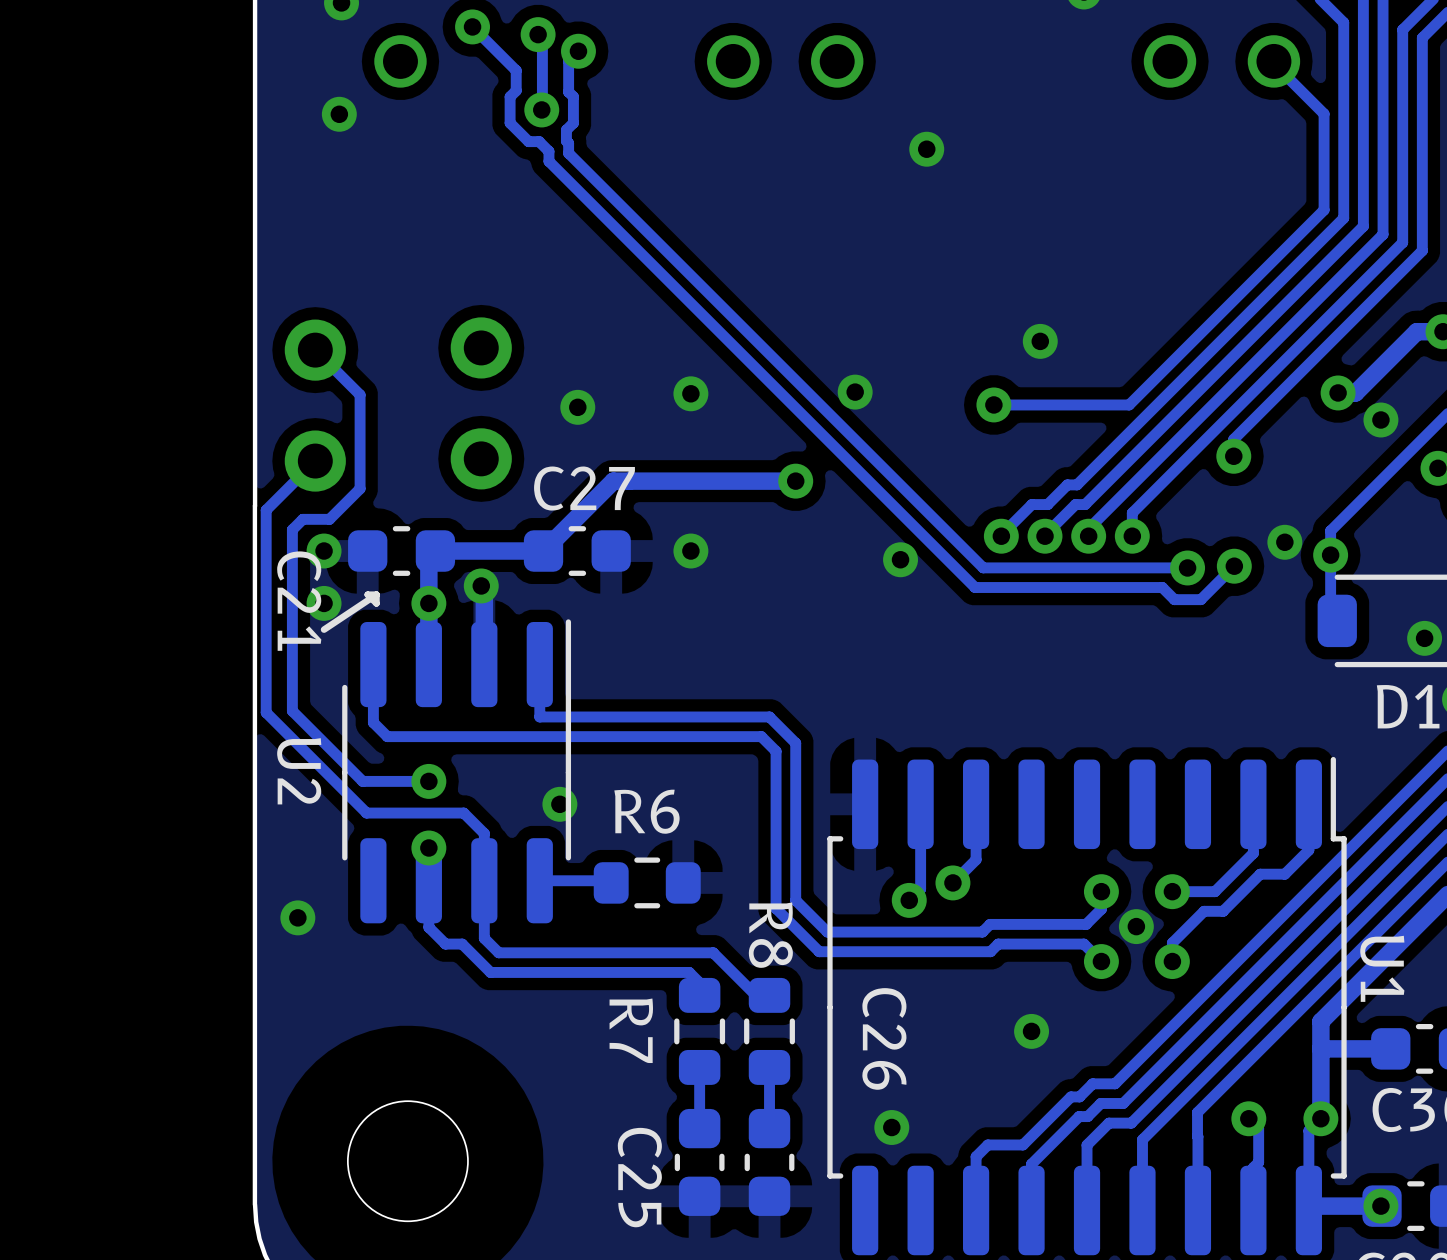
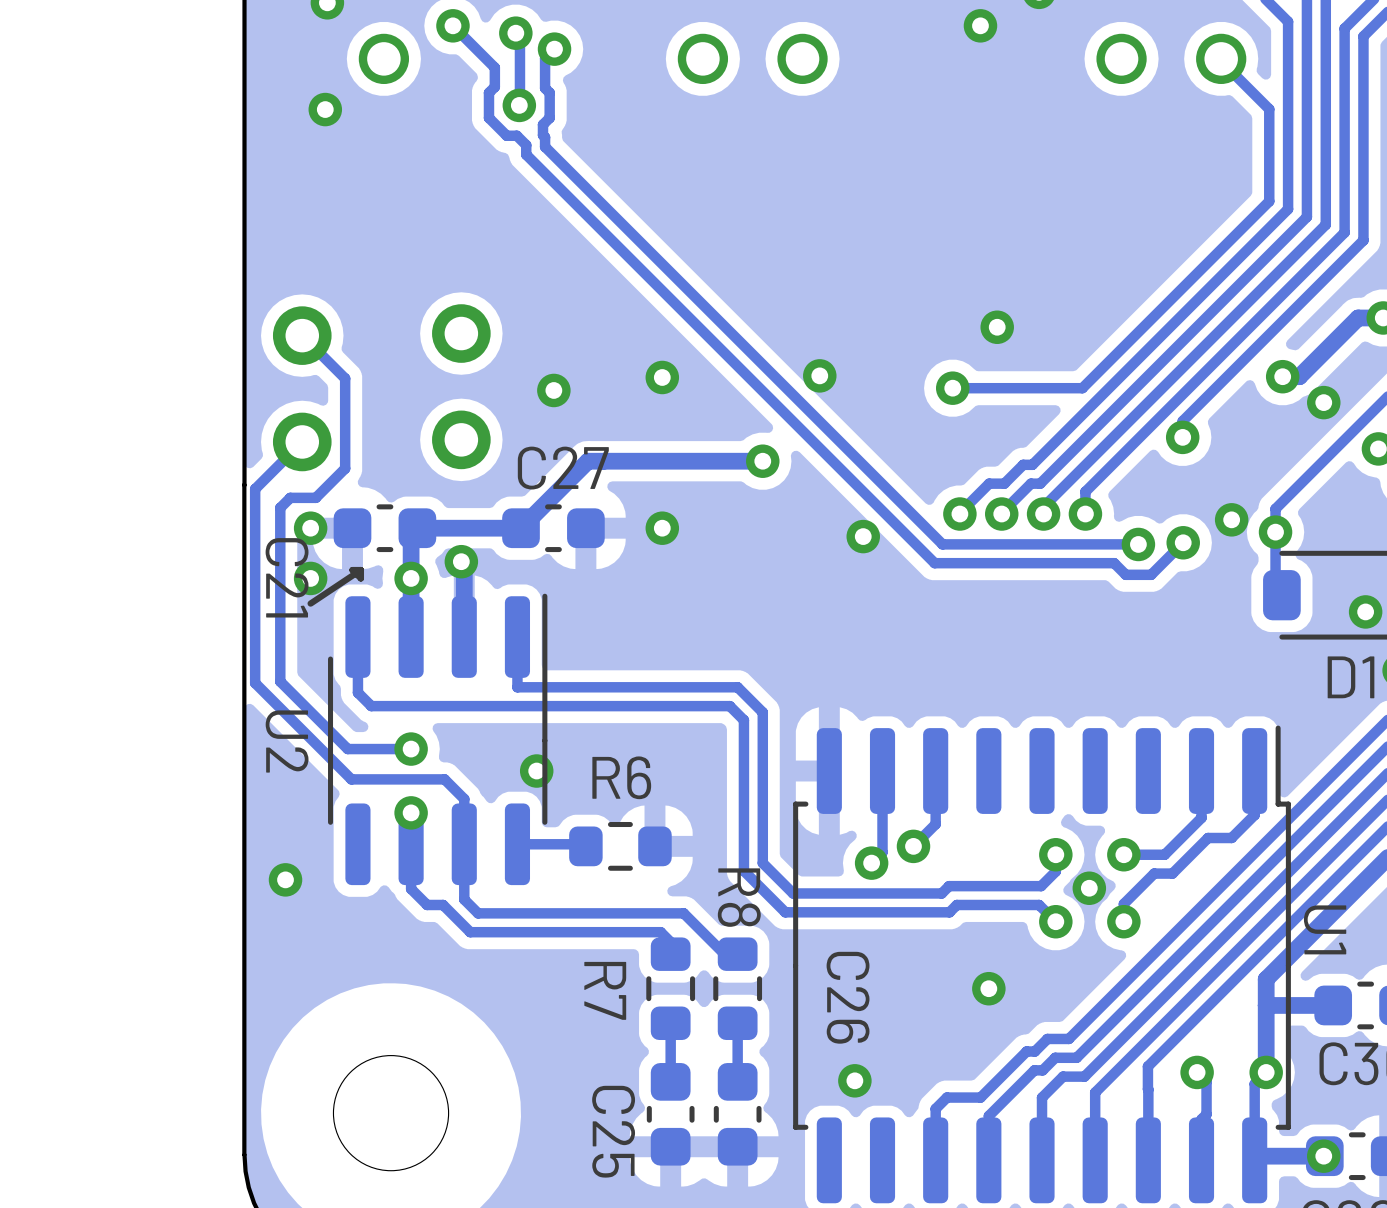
via: none -> (980, 25)
via: (926, 149) -> none

